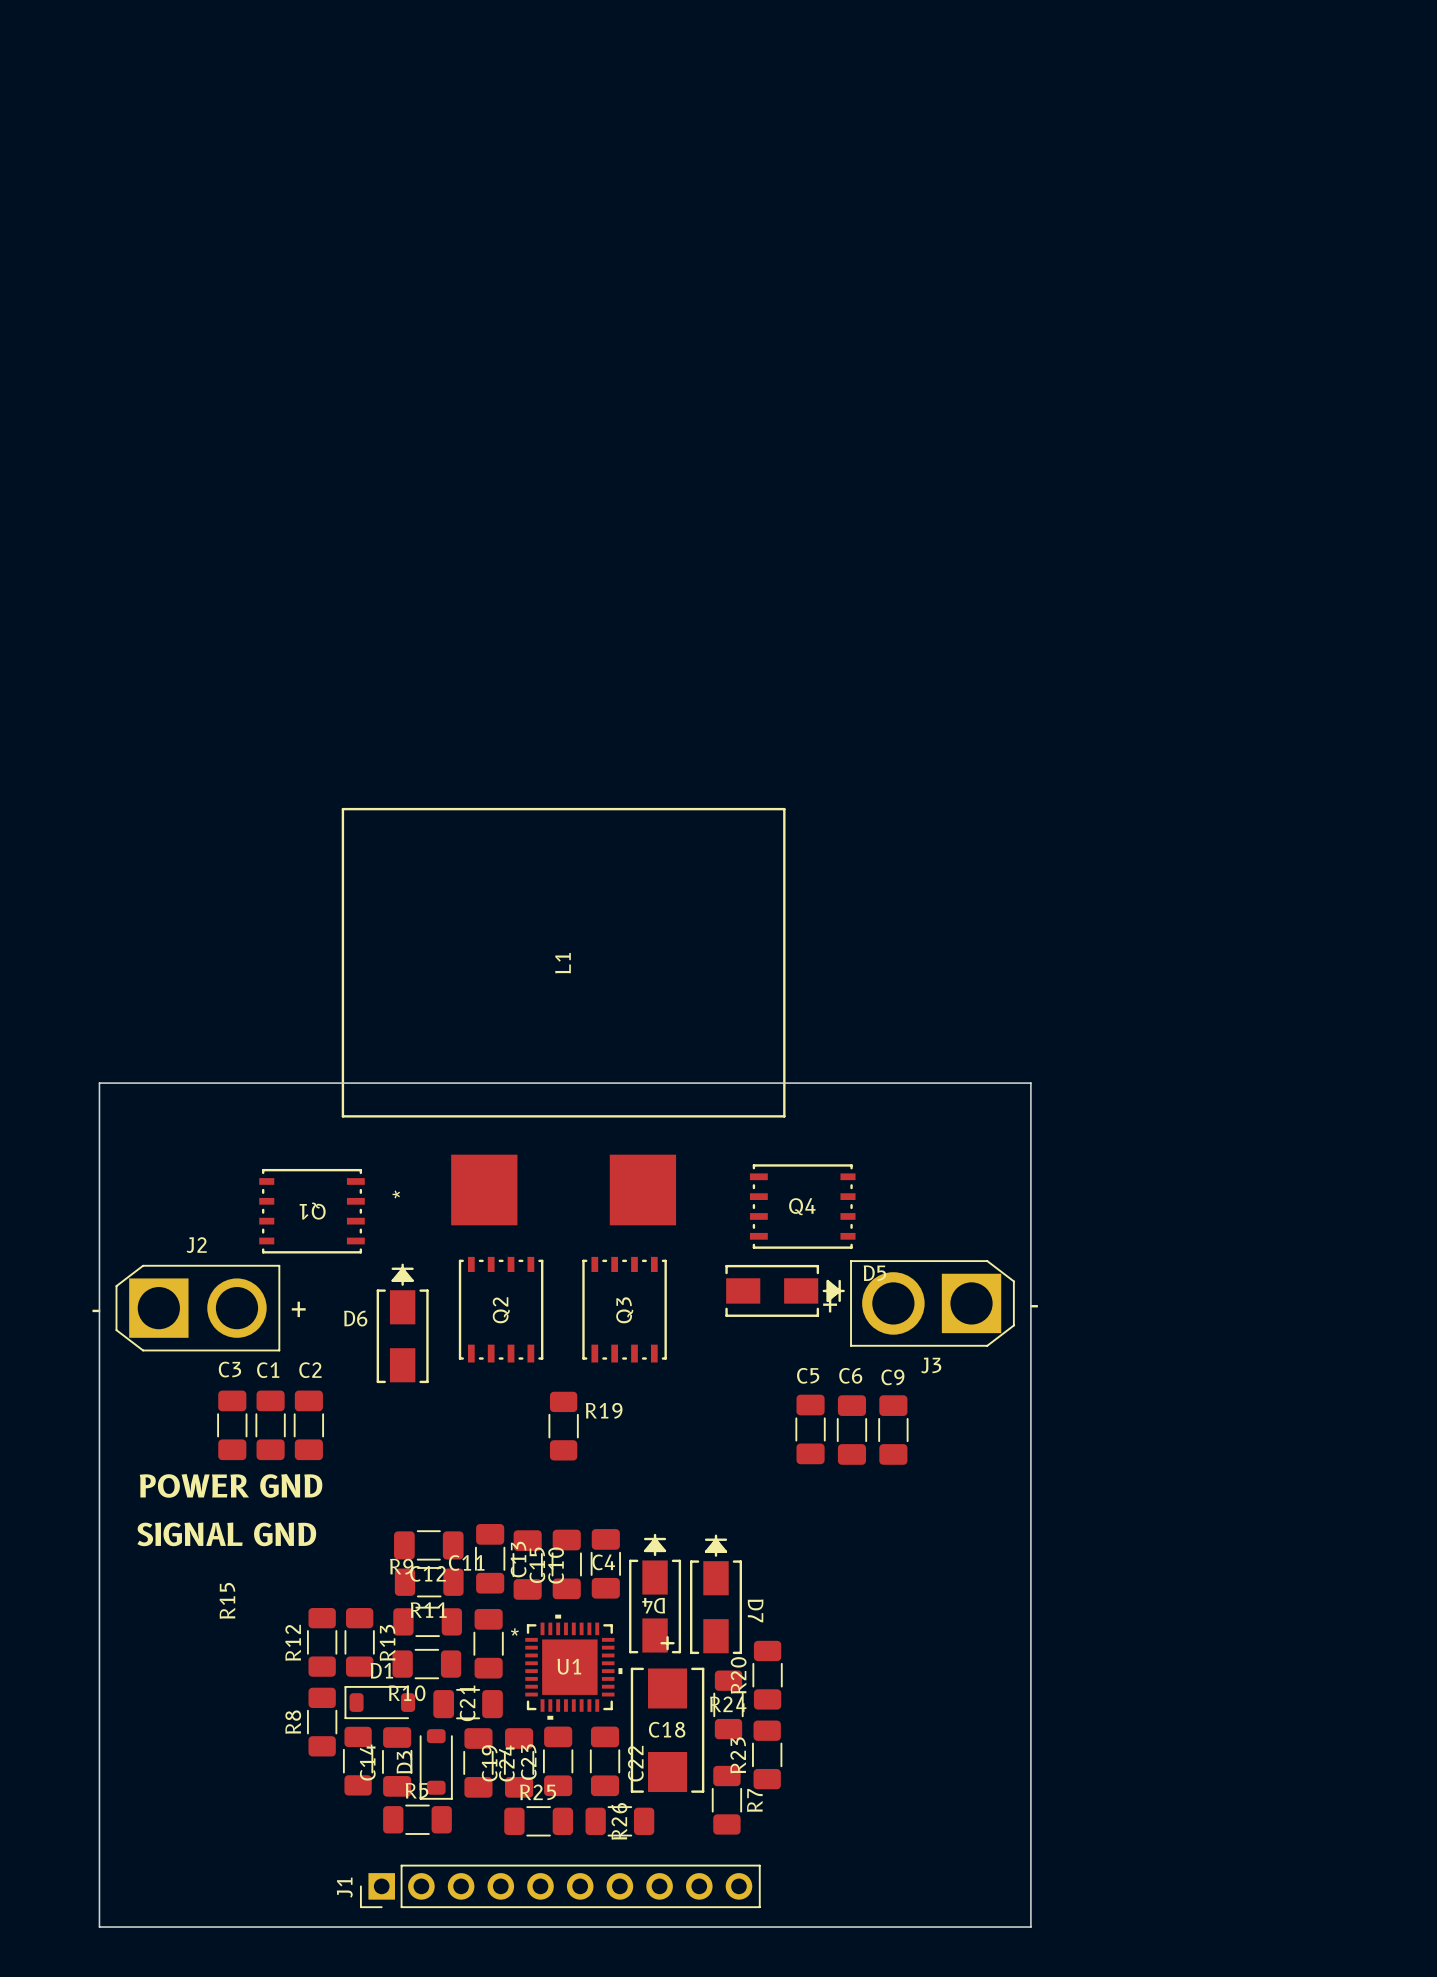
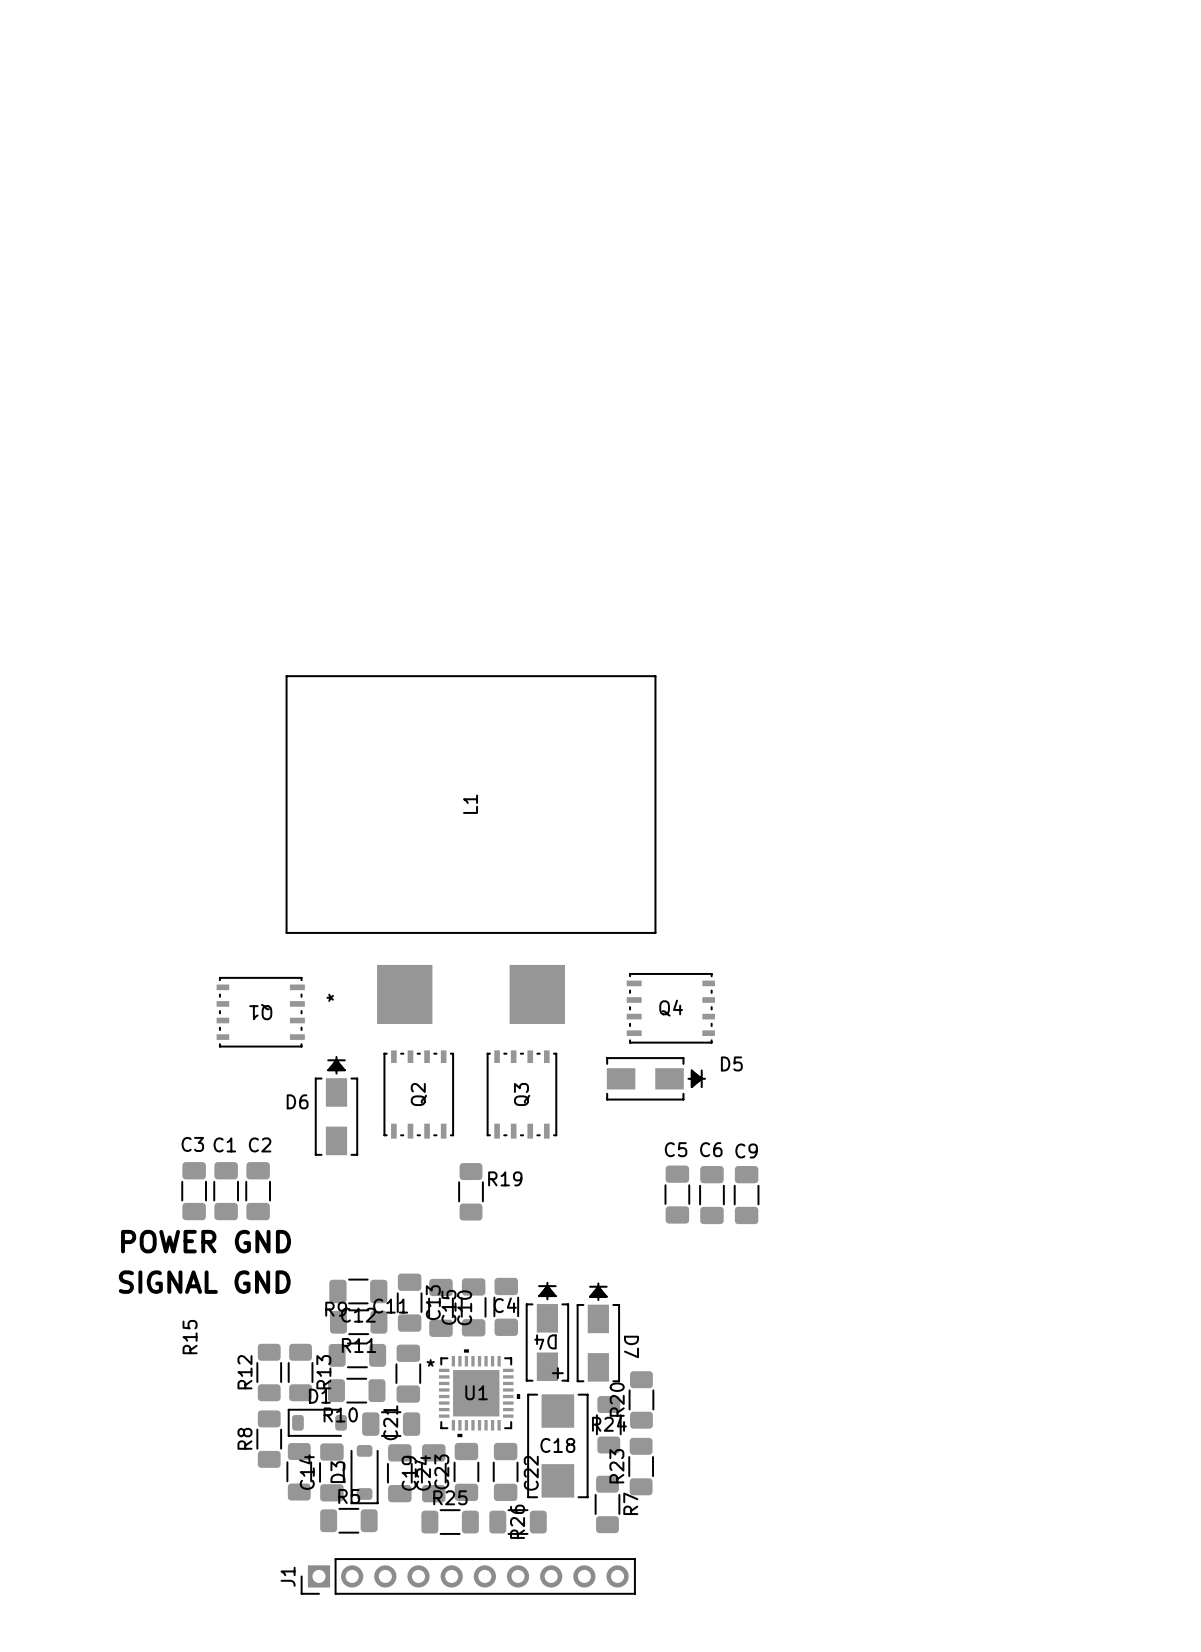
board edge: (99, 1083) (99, 1927) (1030, 1927) (1030, 1083) (99, 1083) -> none
J3: (932, 1303) -> none
J2: (197, 1308) -> none

